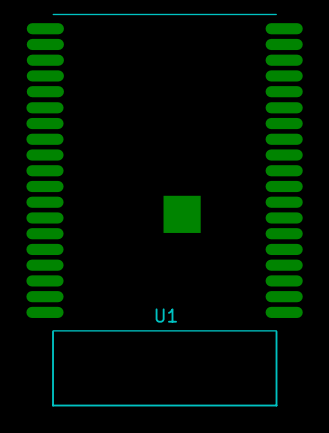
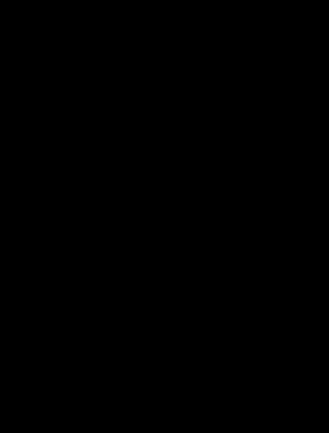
U1: (164, 210) -> none

